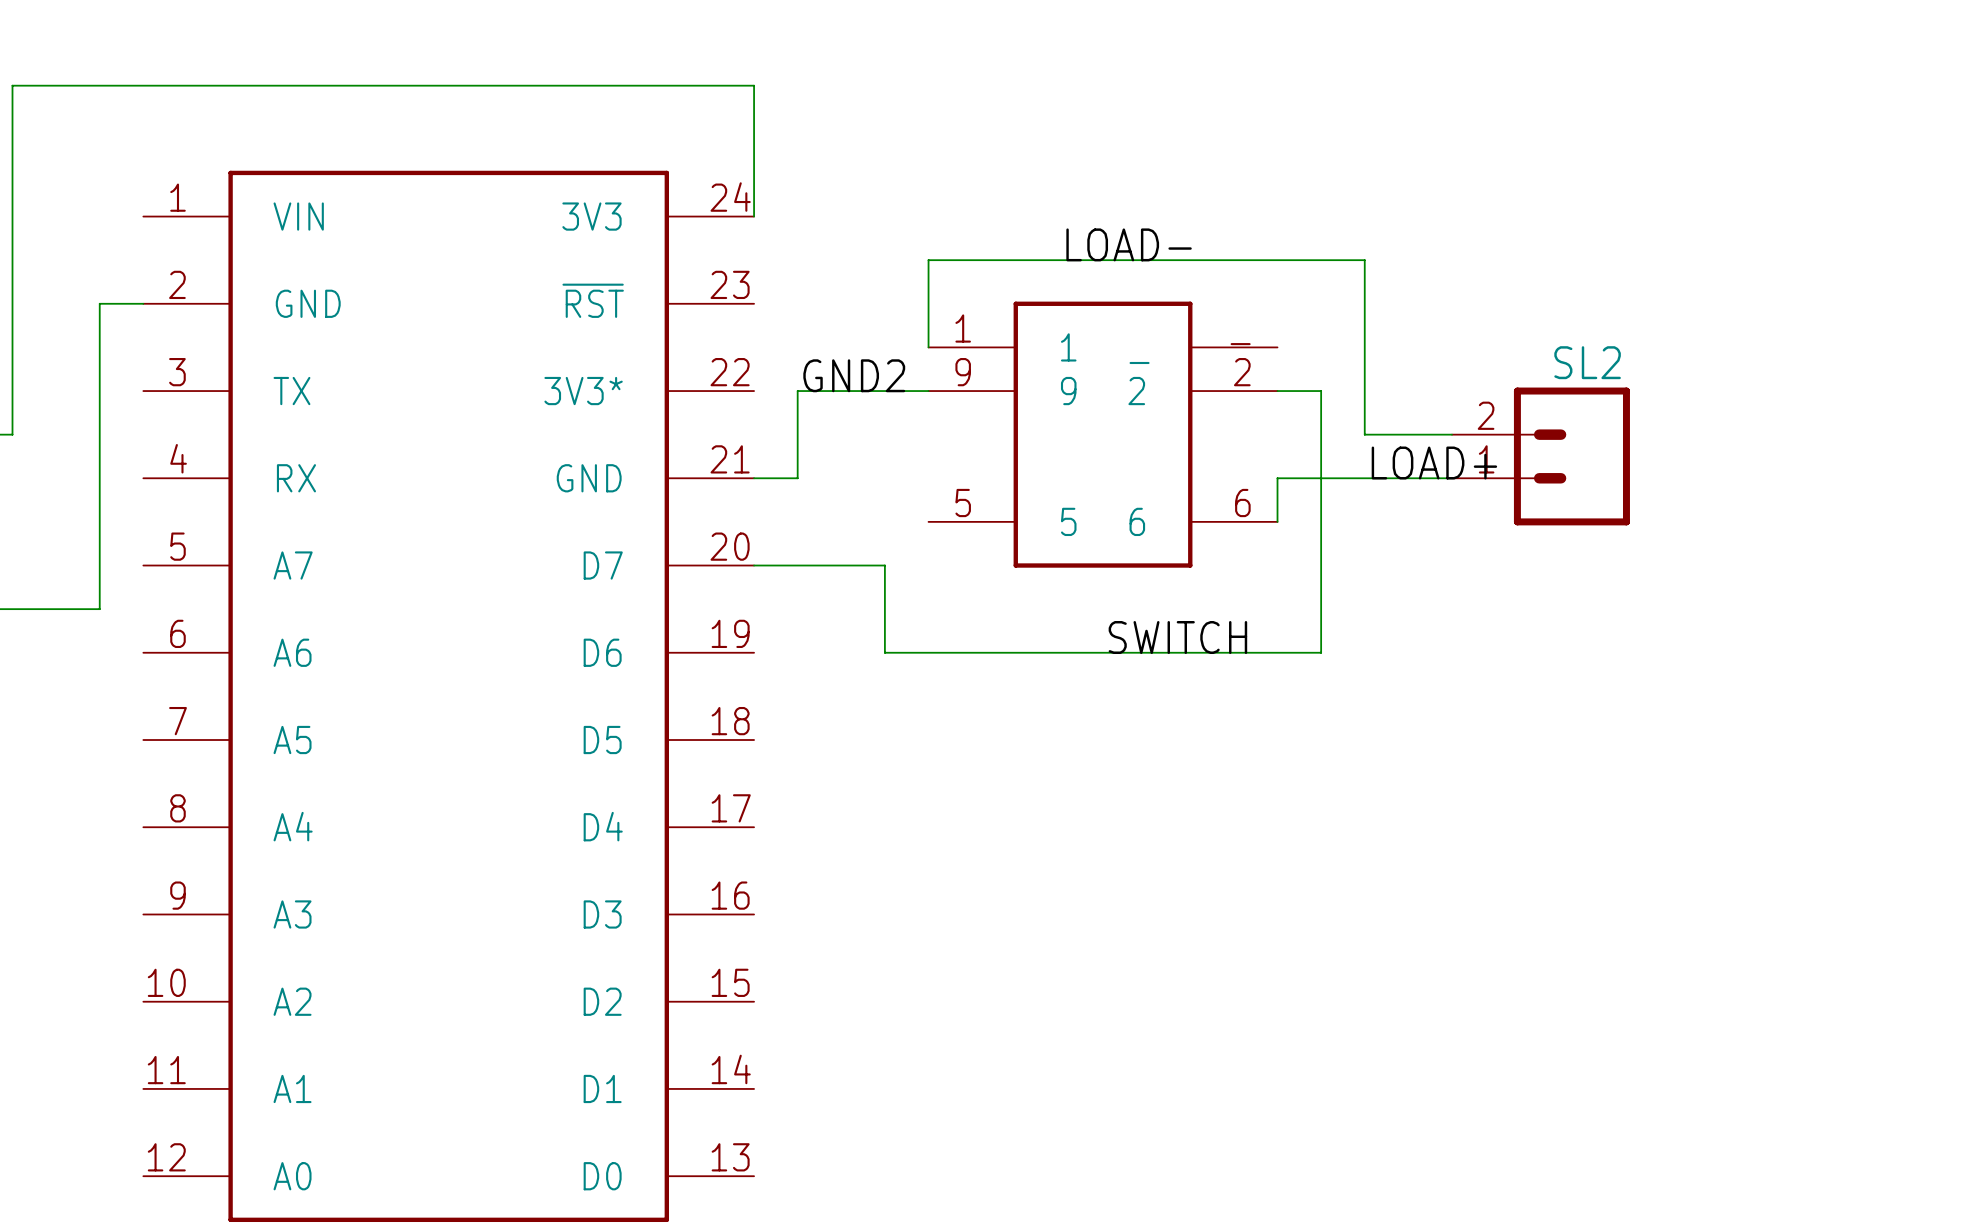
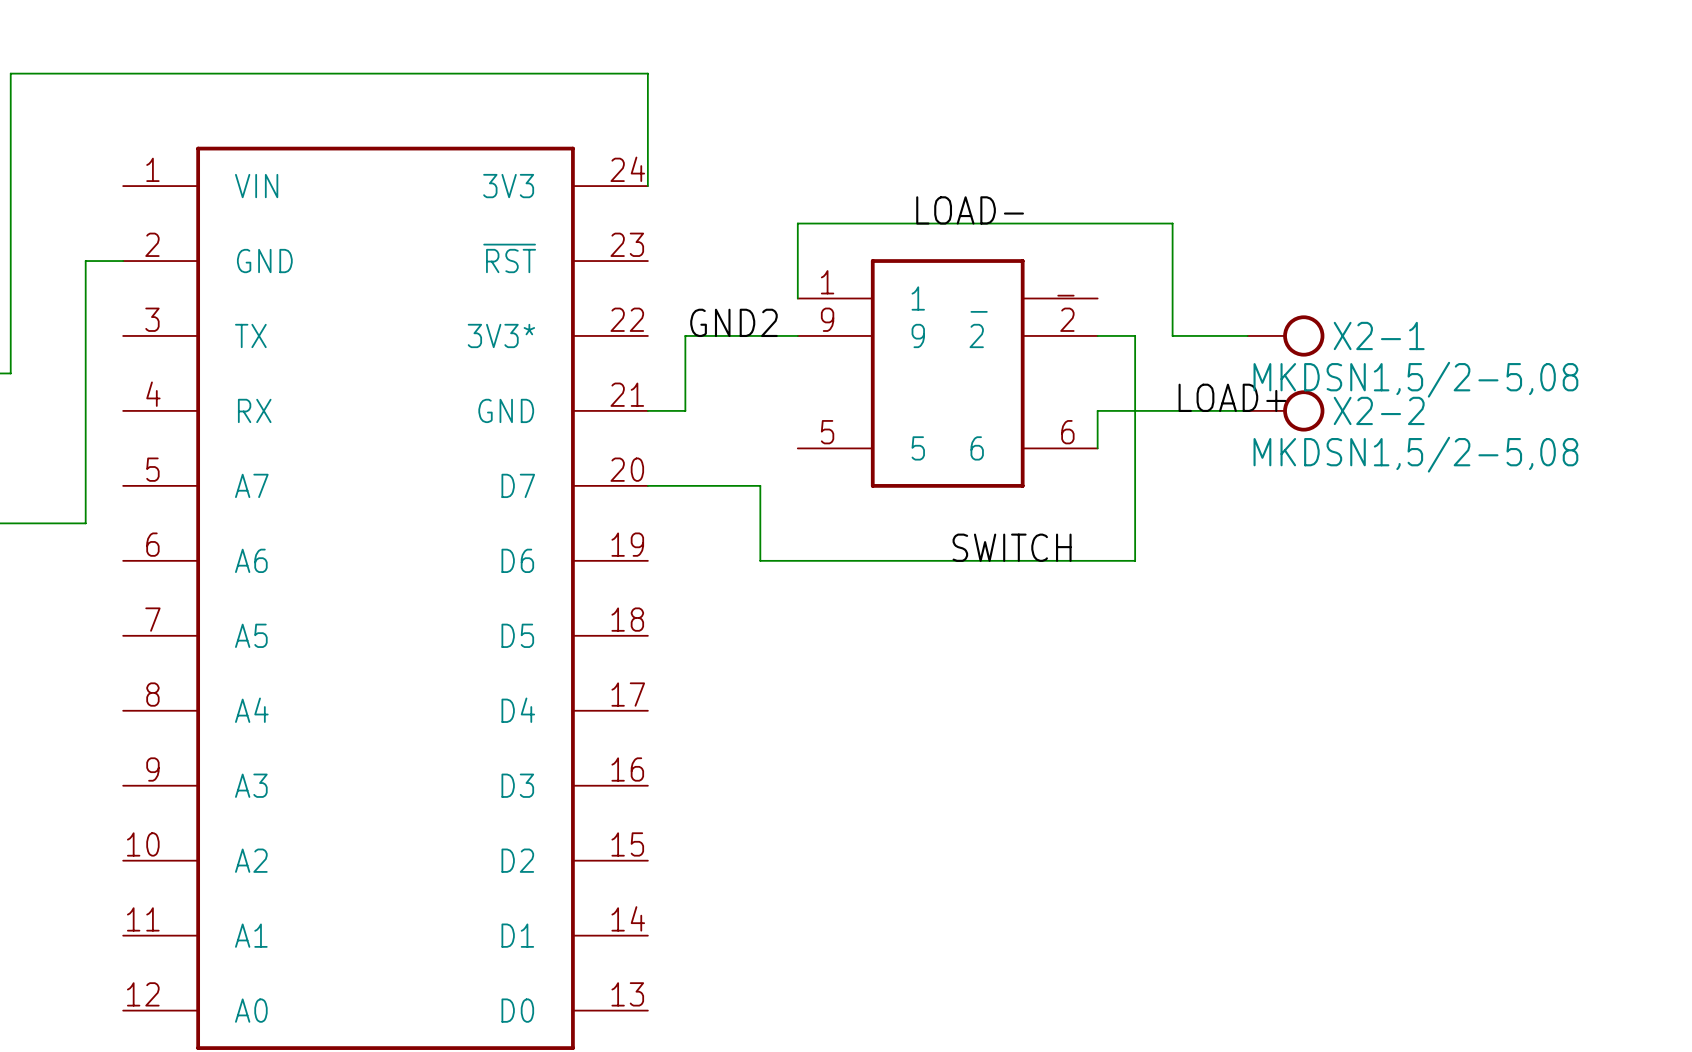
wire: (1364, 391) (1364, 434) (1451, 434) -> (1172, 335) (1247, 335)
X2-1: none -> MKDSN1,5/2-5,08 (1285, 335)
SL2: (1540, 456) -> none
X2-2: none -> MKDSN1,5/2-5,08 (1285, 410)

